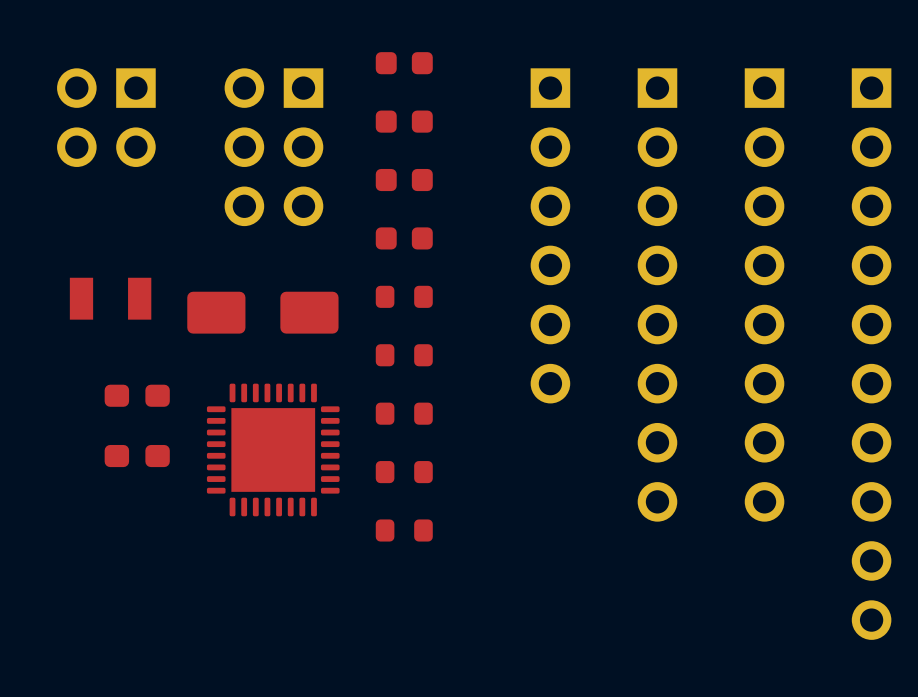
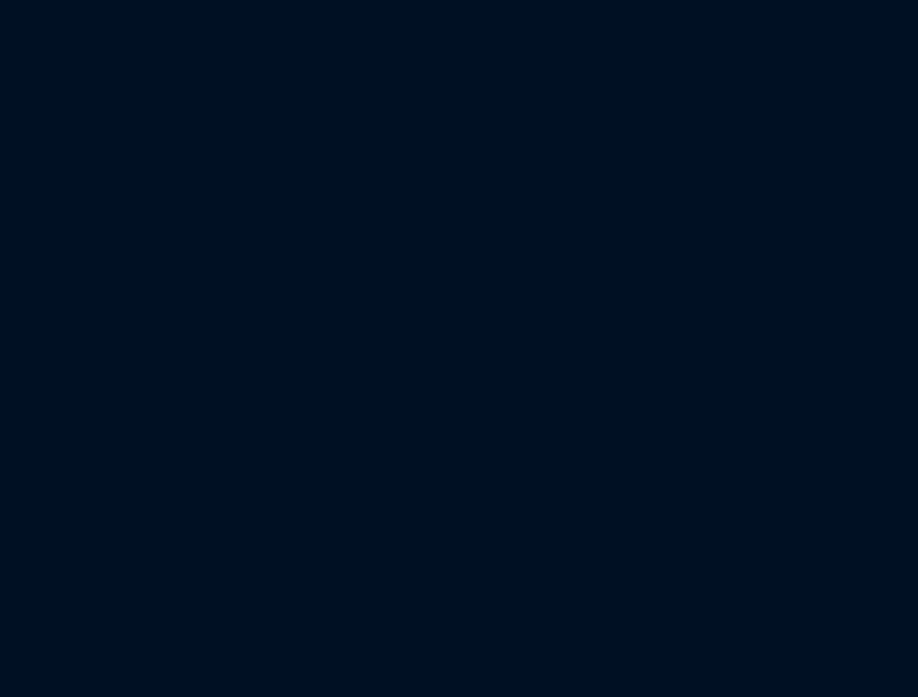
part: (404, 63) -> none
part: (106, 117) -> none
part: (404, 121) -> none
part: (273, 147) -> none
part: (404, 180) -> none
part: (550, 235) -> none
part: (404, 238) -> none
part: (657, 294) -> none
part: (764, 294) -> none
part: (404, 296) -> none
part: (110, 298) -> none
part: (262, 312) -> none
part: (871, 354) -> none
part: (404, 355) -> none
part: (137, 395) -> none
part: (404, 413) -> none
part: (273, 449) -> none
part: (137, 456) -> none
part: (404, 472) -> none
part: (404, 530) -> none

